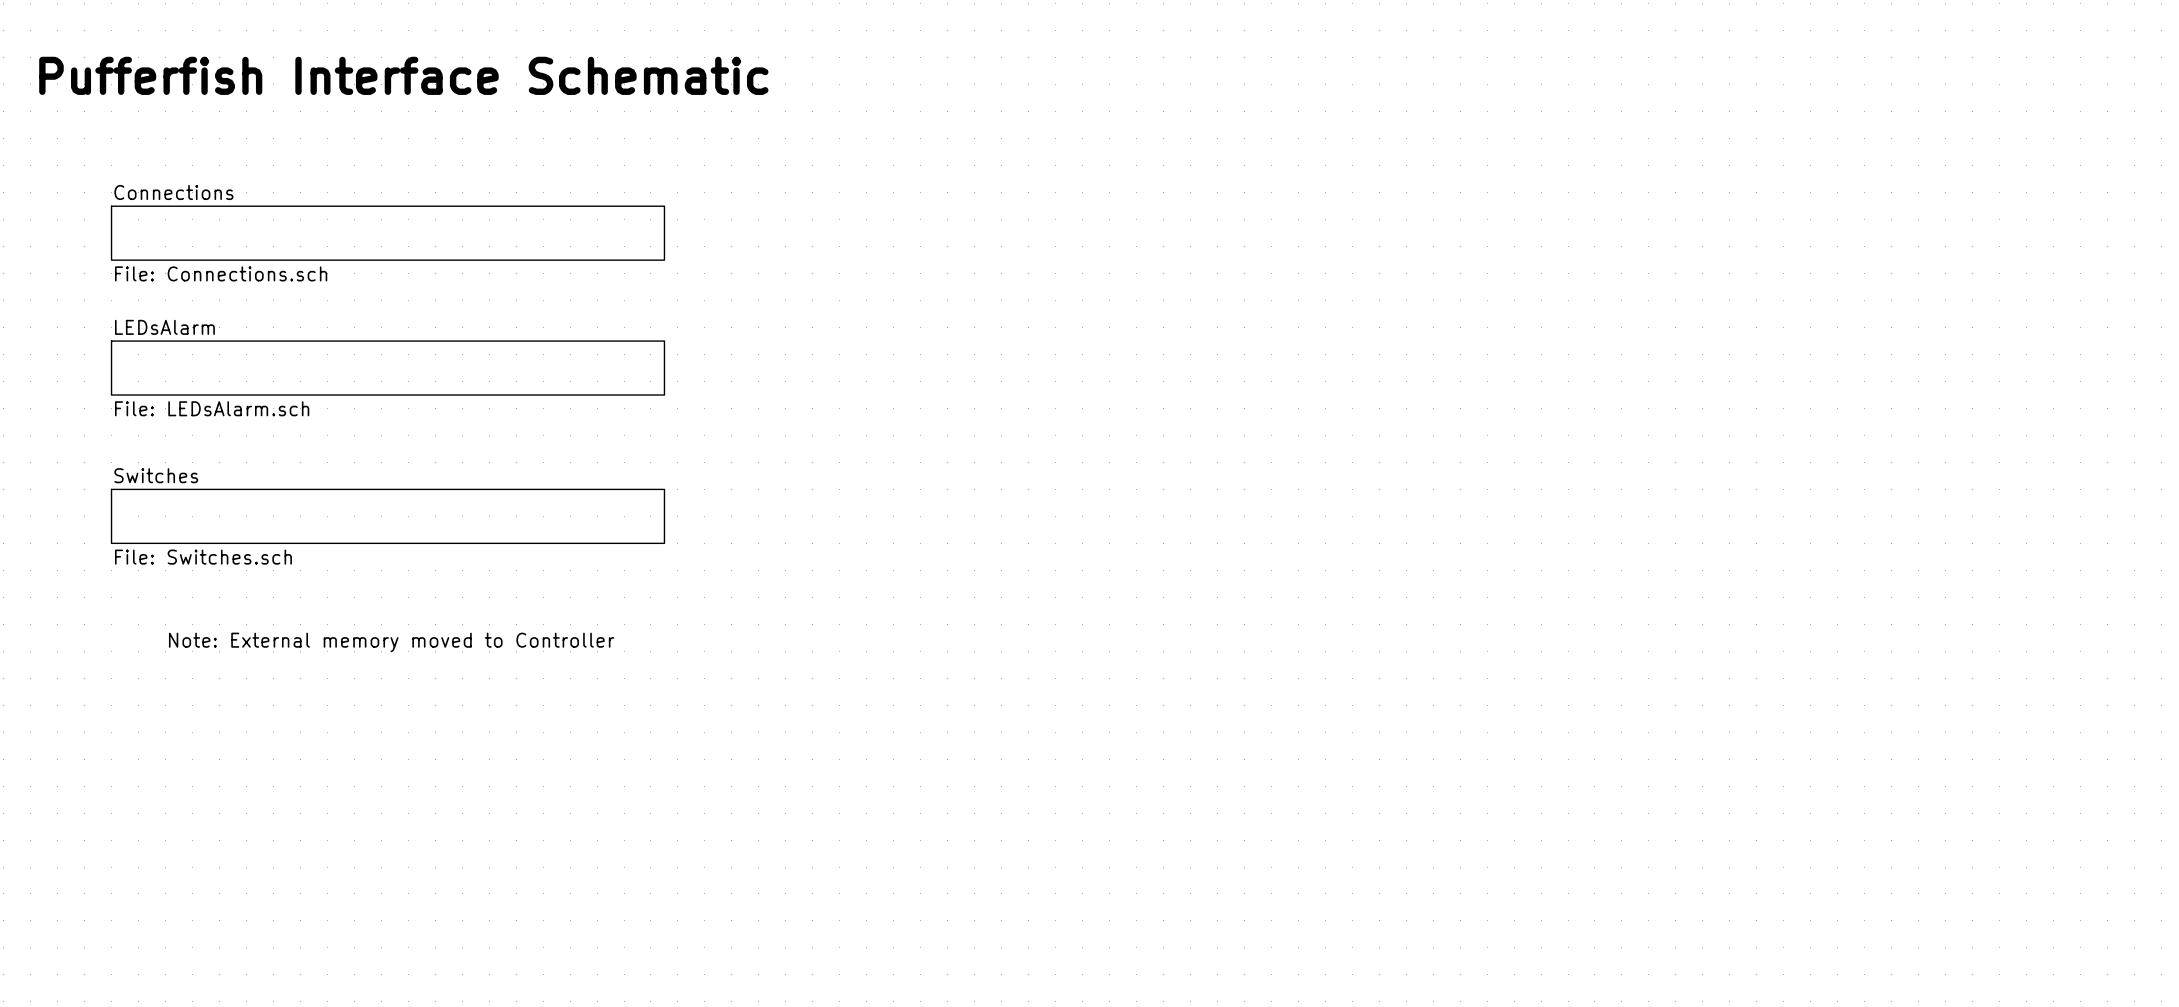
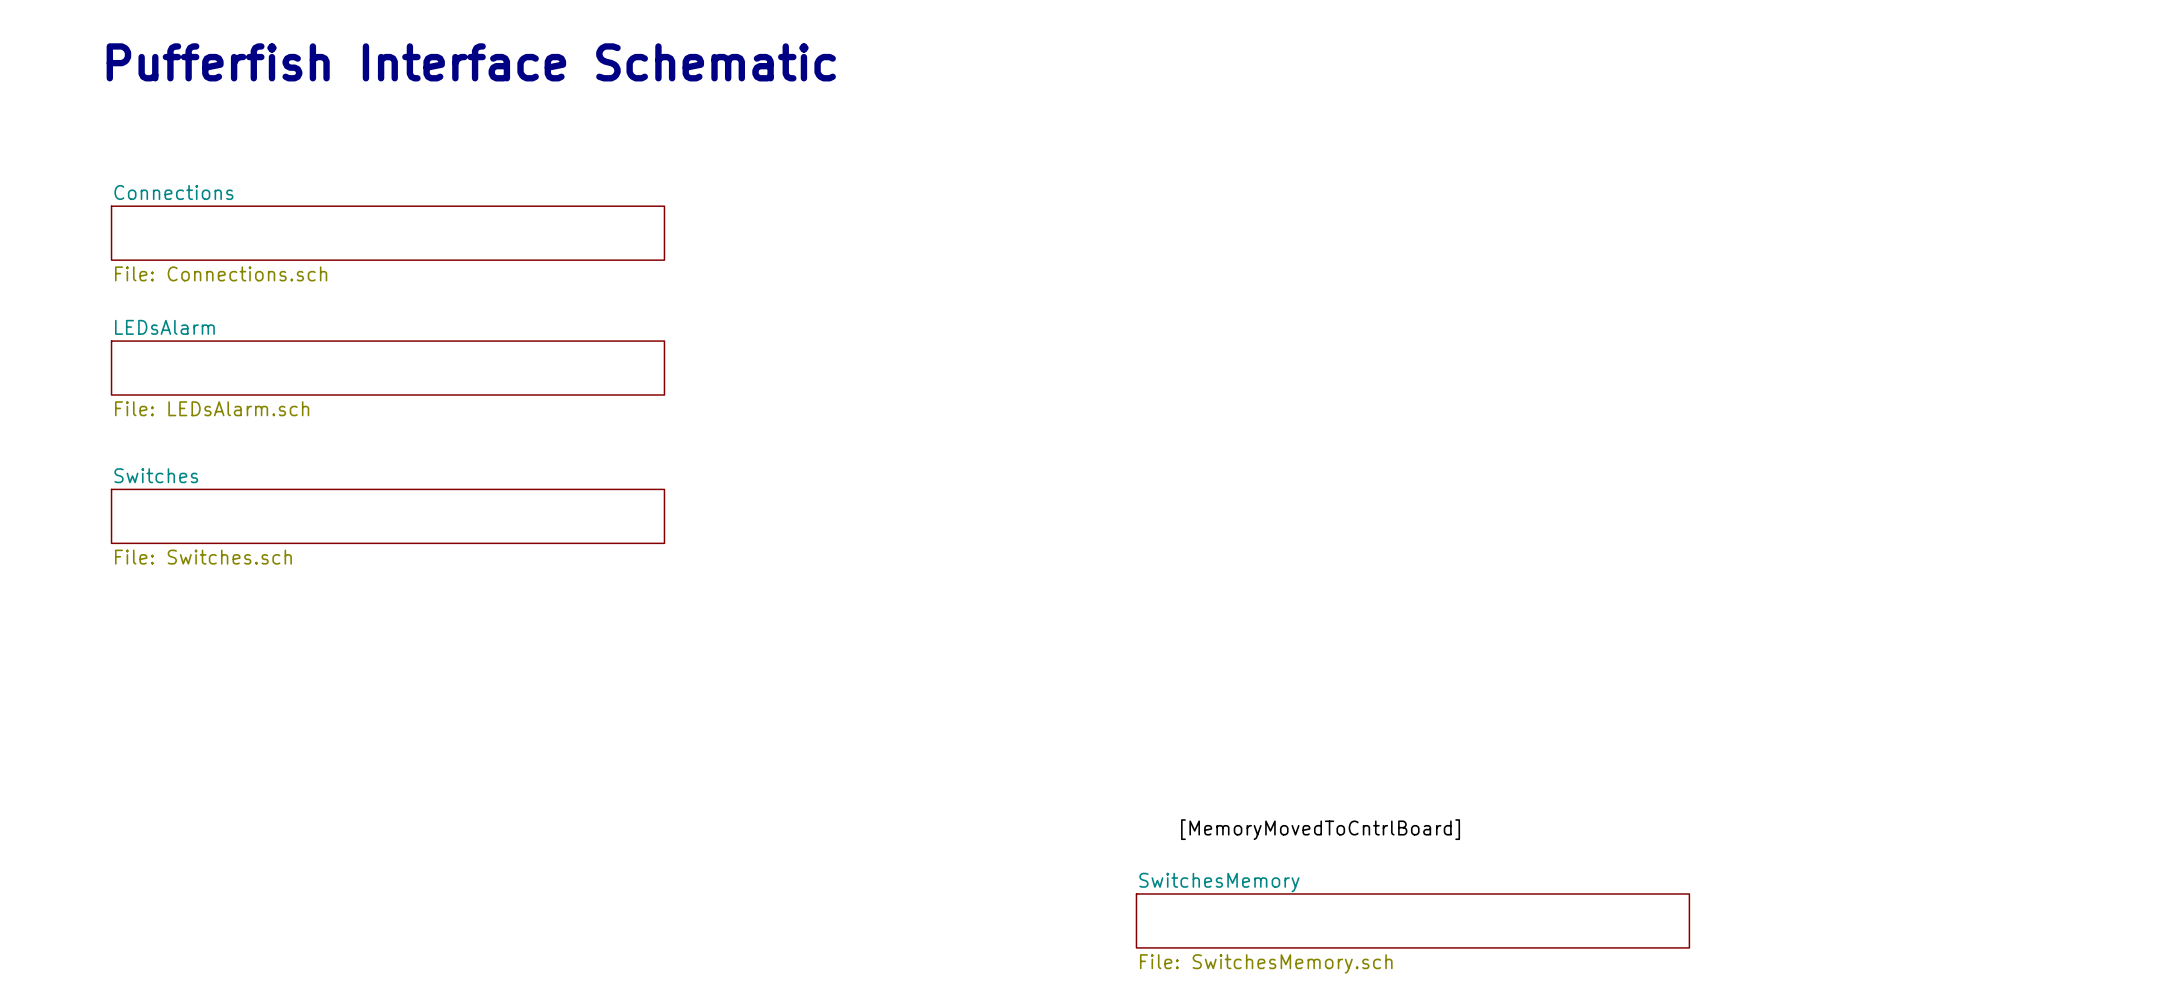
text position: Pufferfish Interface Schematic (403, 75) -> Pufferfish Interface Schematic (471, 62)
text: Note: External memory moved to Controller (391, 642) -> none
label: none -> [MemoryMovedToCntrlBoard] (1320, 829)
sheet SwitchesMemory: none -> File: SwitchesMemory.sch (1412, 920)

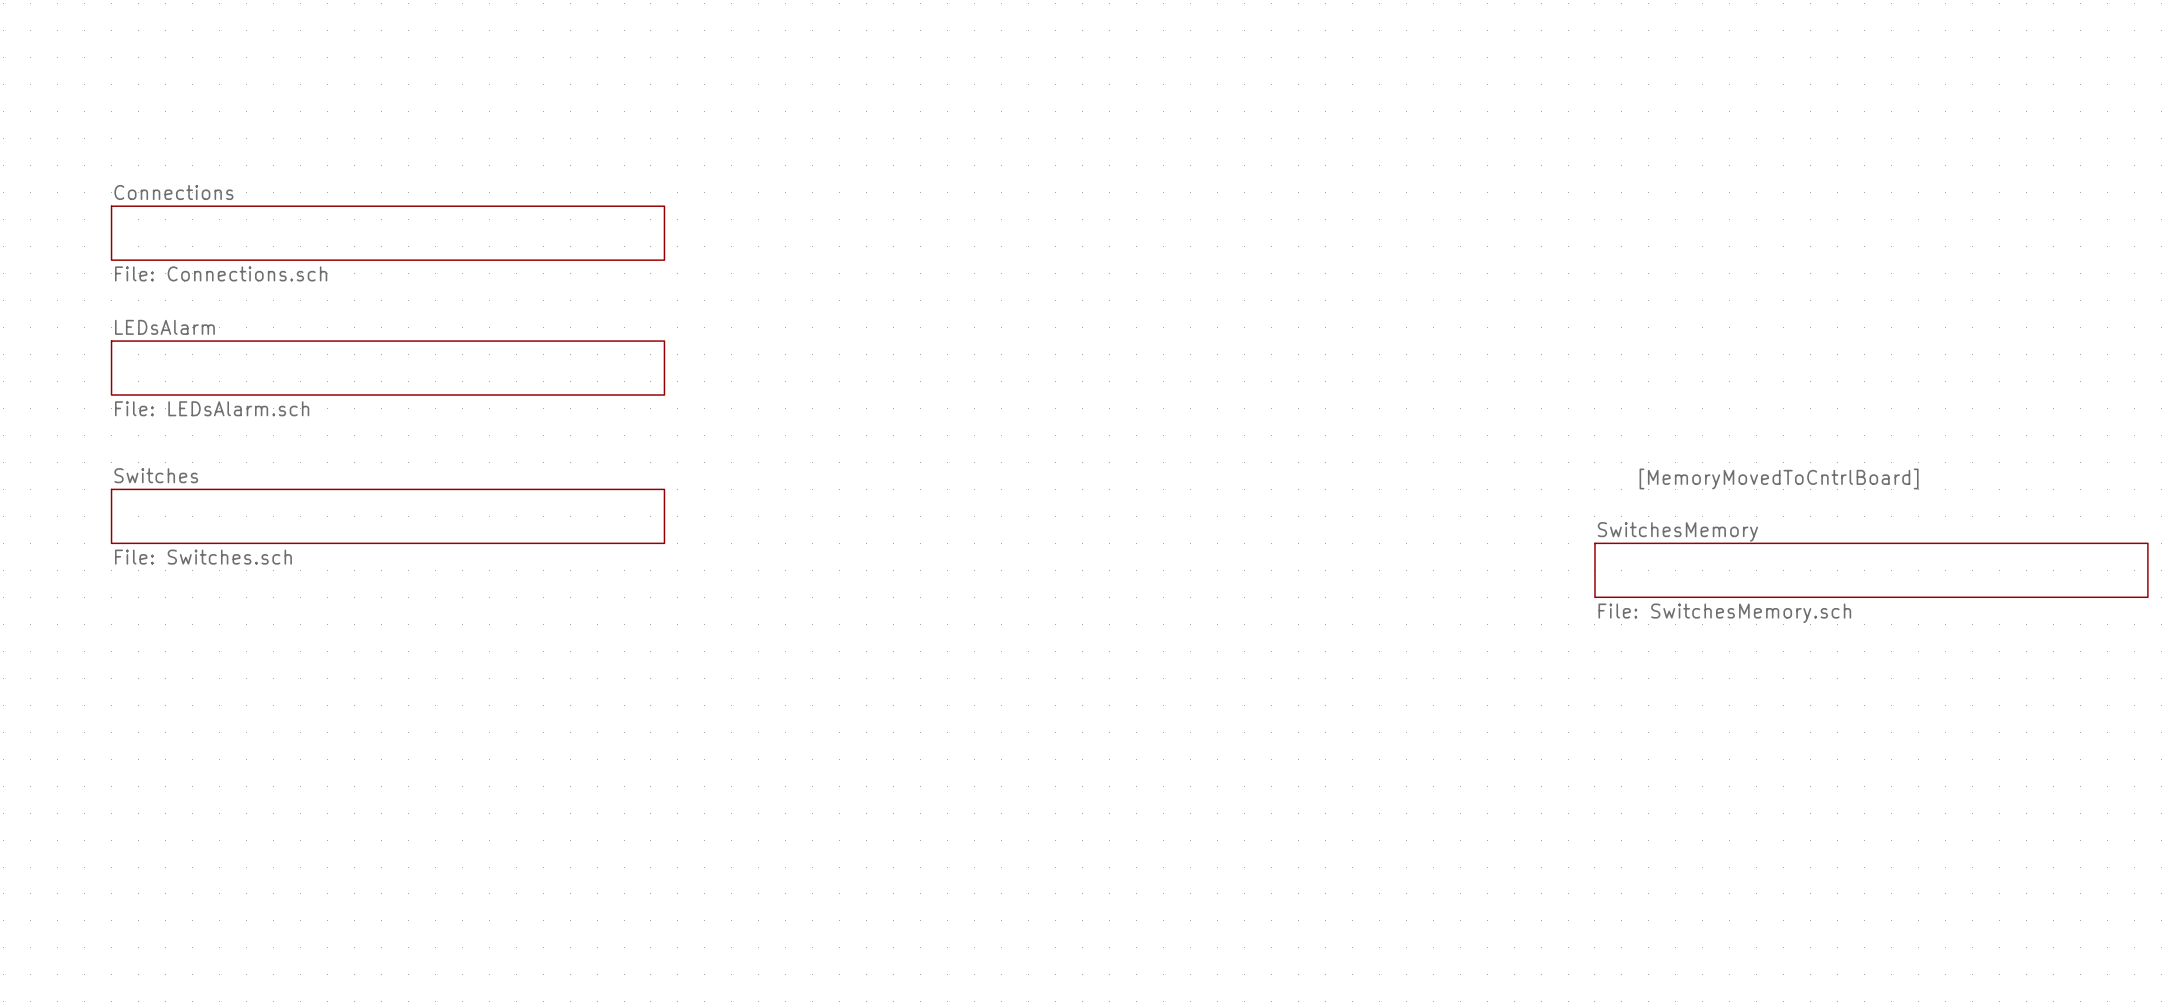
text: Pufferfish Interface Schematic (471, 62) -> none
label: none -> [MemoryMovedToCntrlBoard] (1779, 478)
sheet SwitchesMemory: none -> File: SwitchesMemory.sch (1871, 570)
label: [MemoryMovedToCntrlBoard] (1320, 829) -> none
sheet SwitchesMemory: File: SwitchesMemory.sch (1412, 920) -> none

